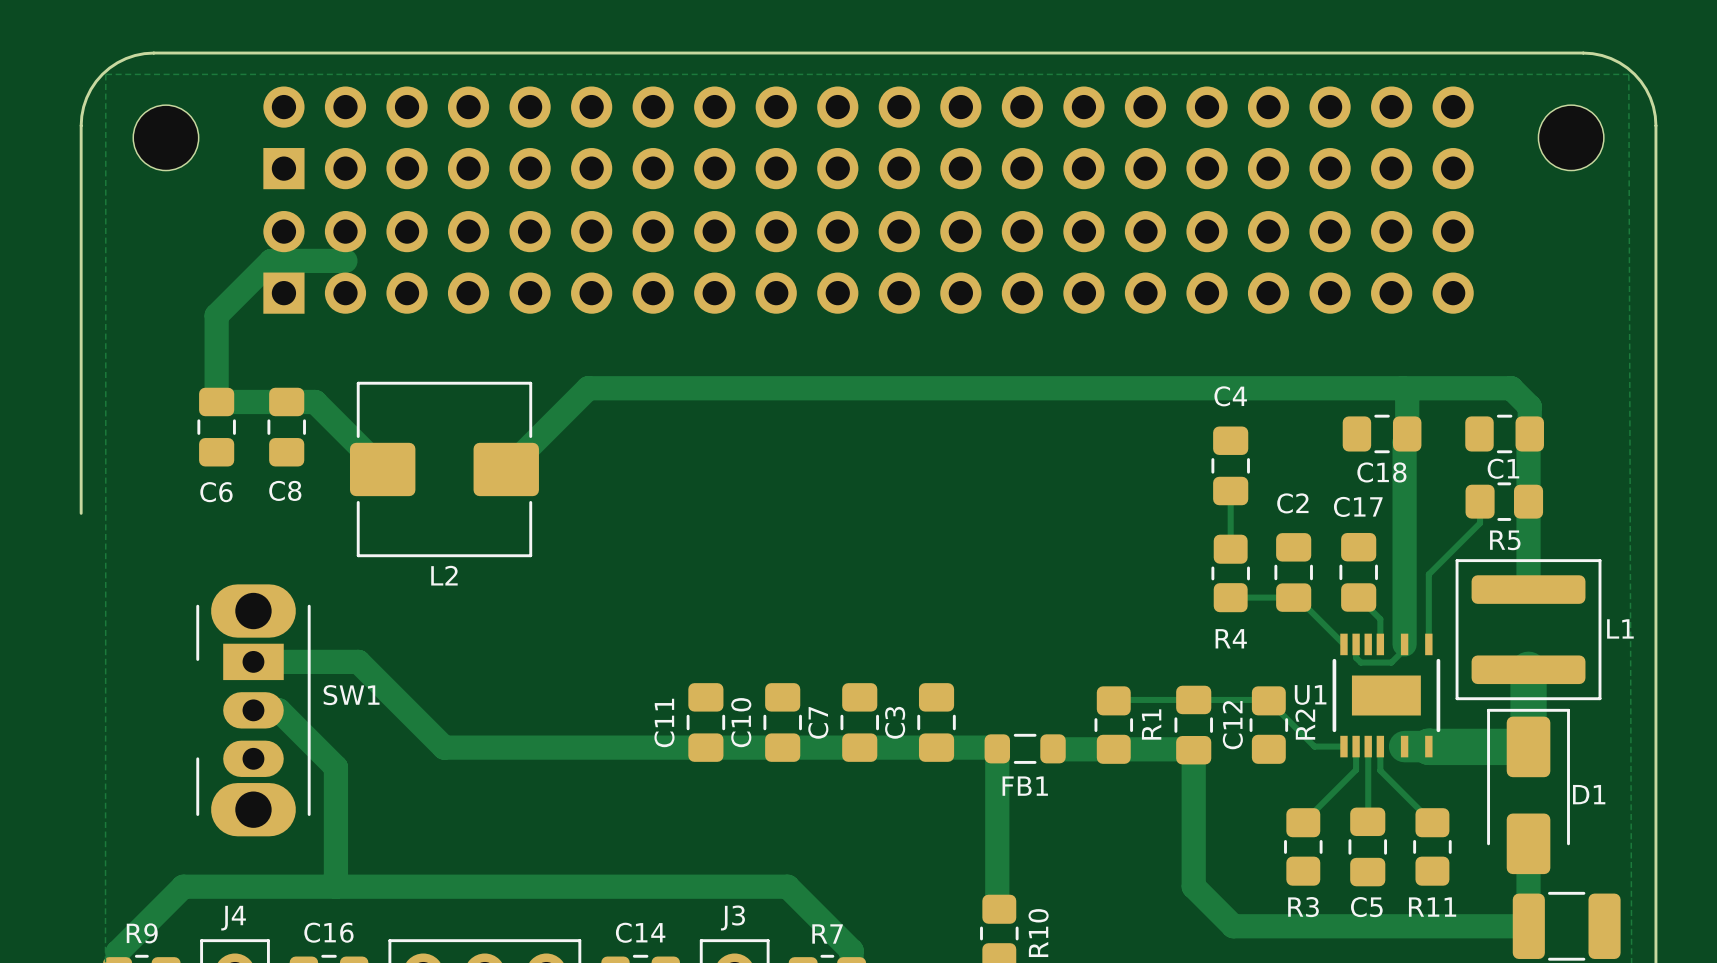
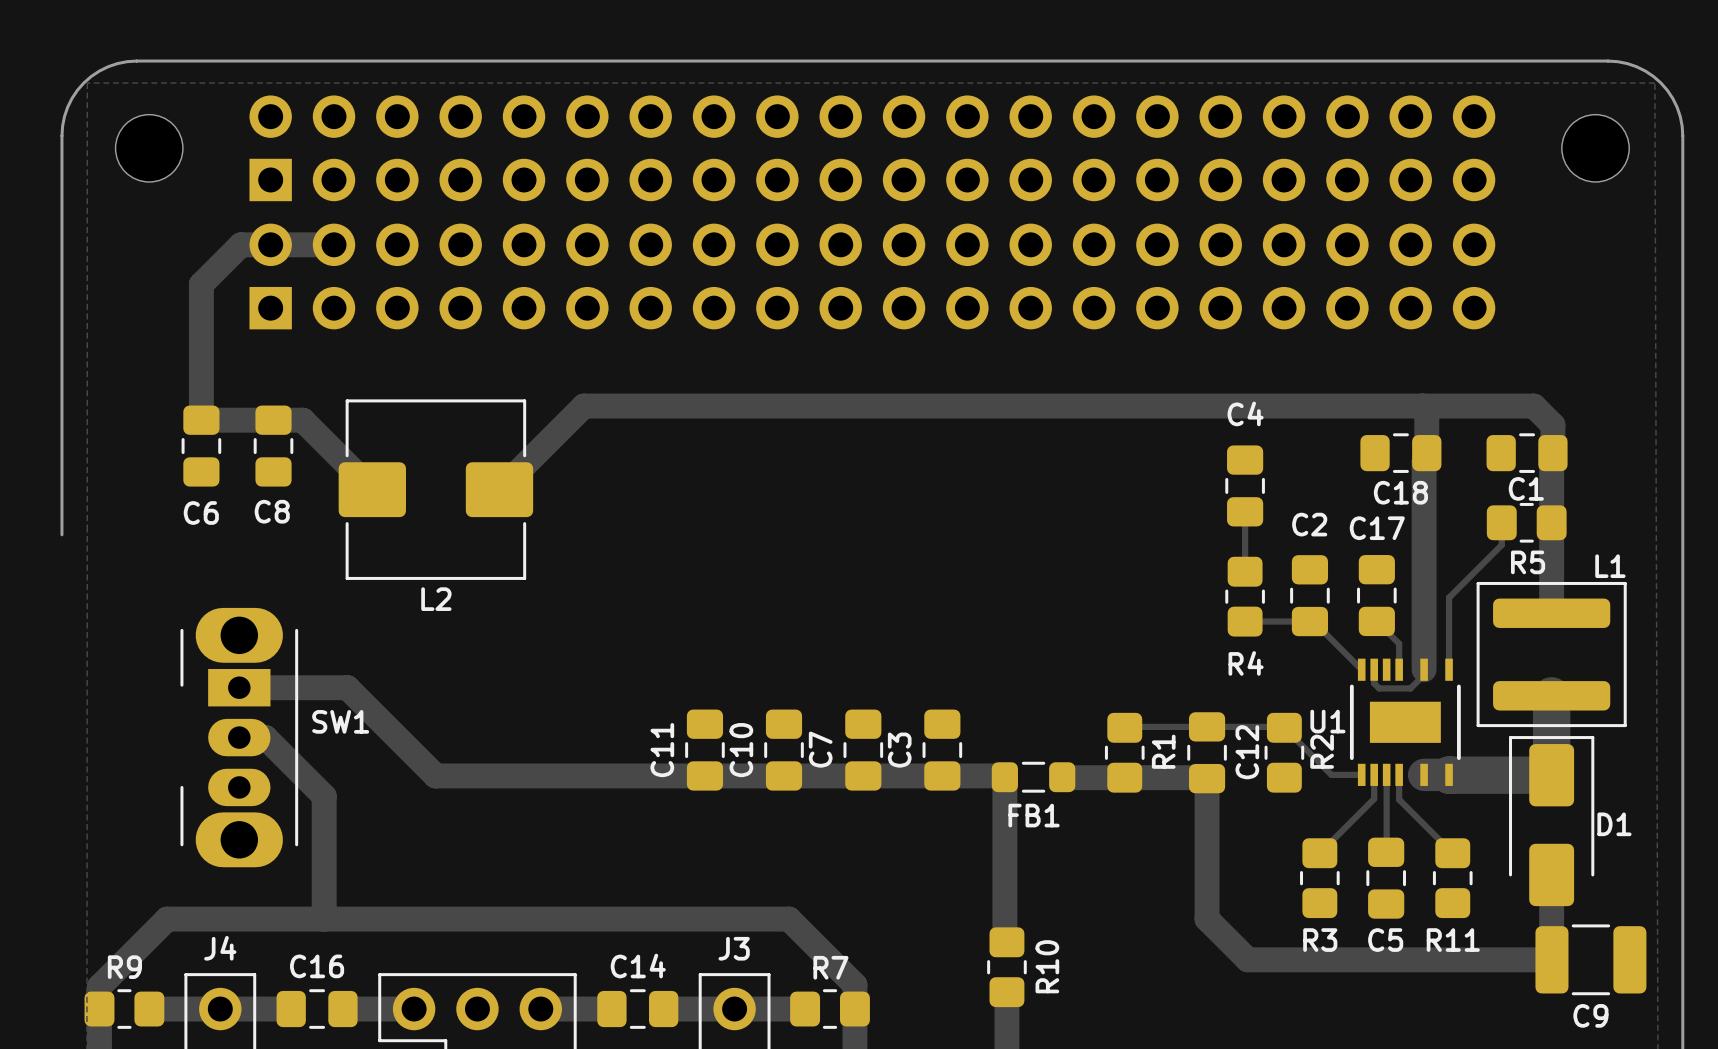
track: (345, 260) (271, 260) (216, 315) -> (334, 244) (240, 244) (201, 284) (201, 331)
L1 name position: L1 (1620, 628) -> L1 (1610, 566)

